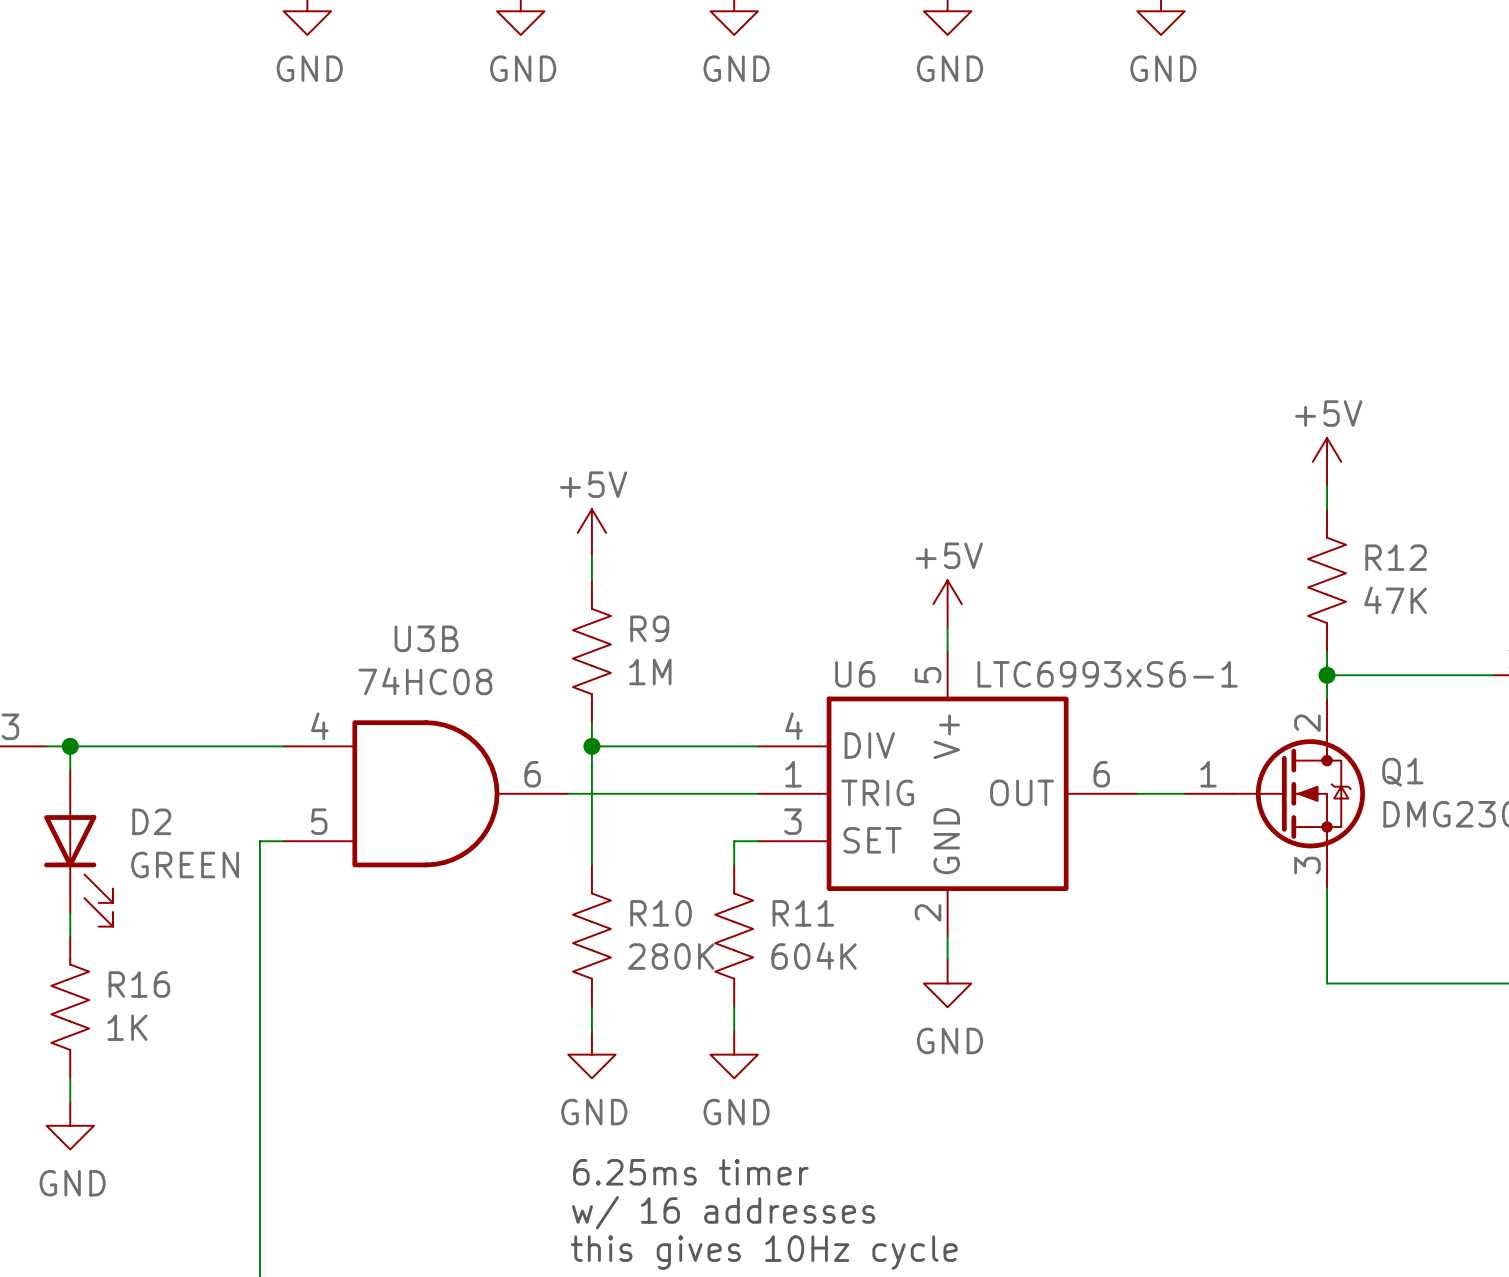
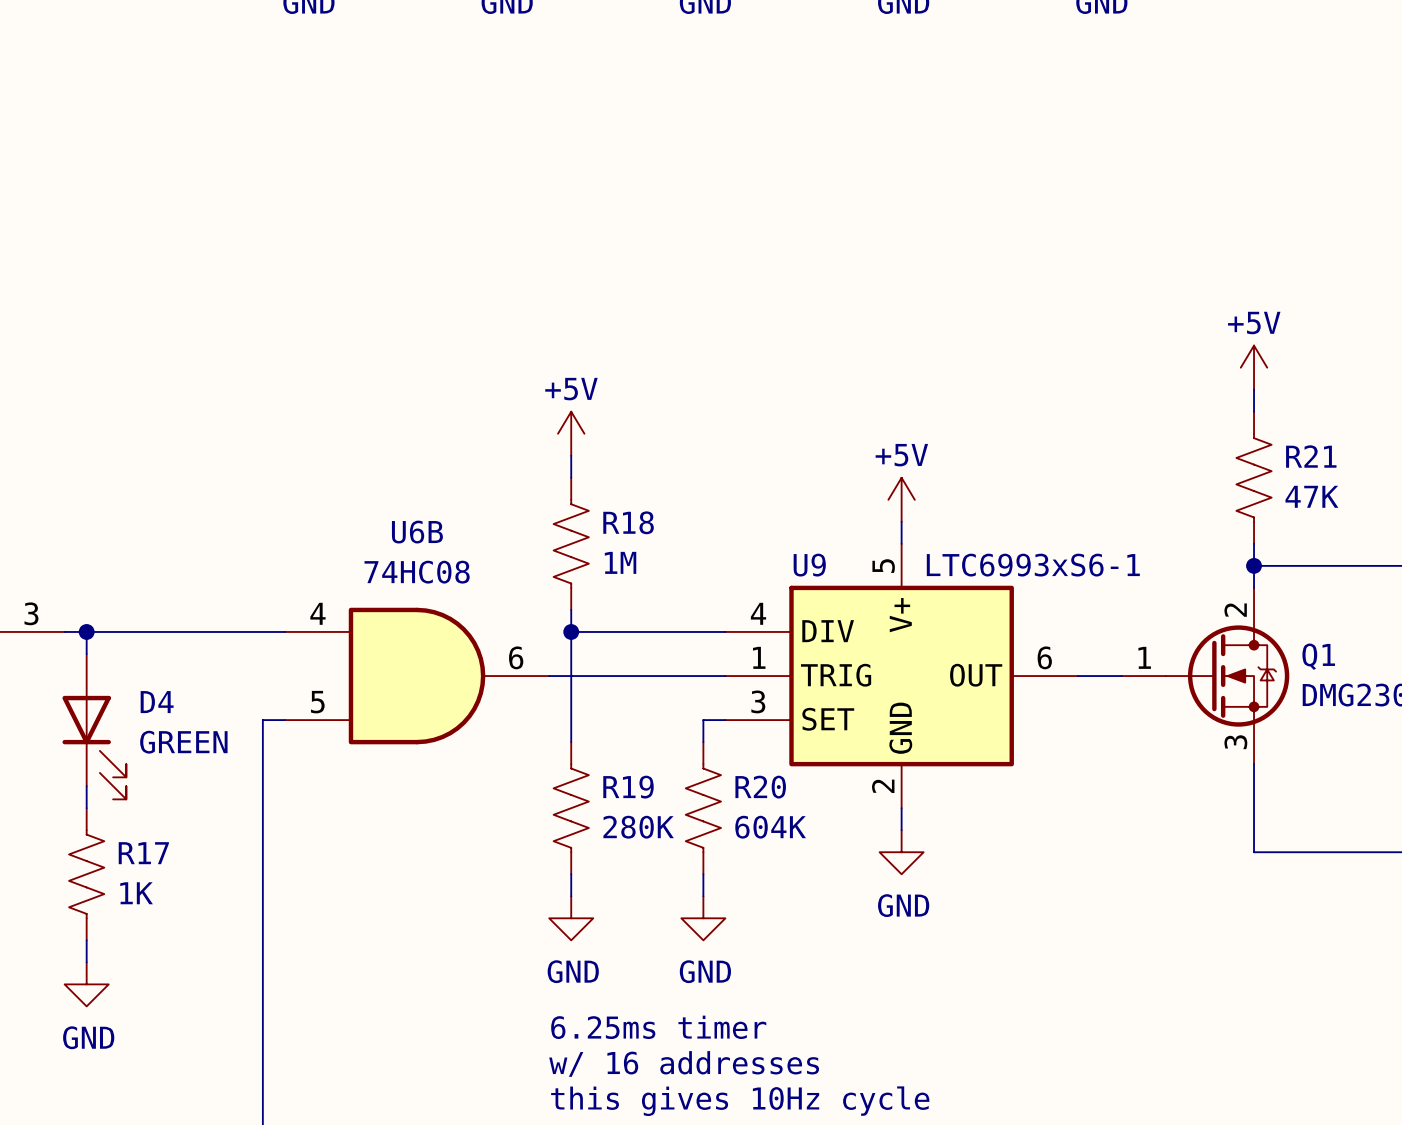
R12 name: R12 (1396, 557) -> R21 (1311, 456)
R9 name: R9 (649, 628) -> R18 (628, 522)
U3B name: U3B (426, 638) -> U6B (417, 532)
U6 name: U6 (855, 674) -> U9 (809, 565)
D2 name: D2 (151, 821) -> D4 (157, 702)
R10 name: R10 (661, 913) -> R19 (628, 787)
R11 name: R11 (803, 913) -> R20 (760, 787)
R16 name: R16 (139, 984) -> R17 (143, 853)

